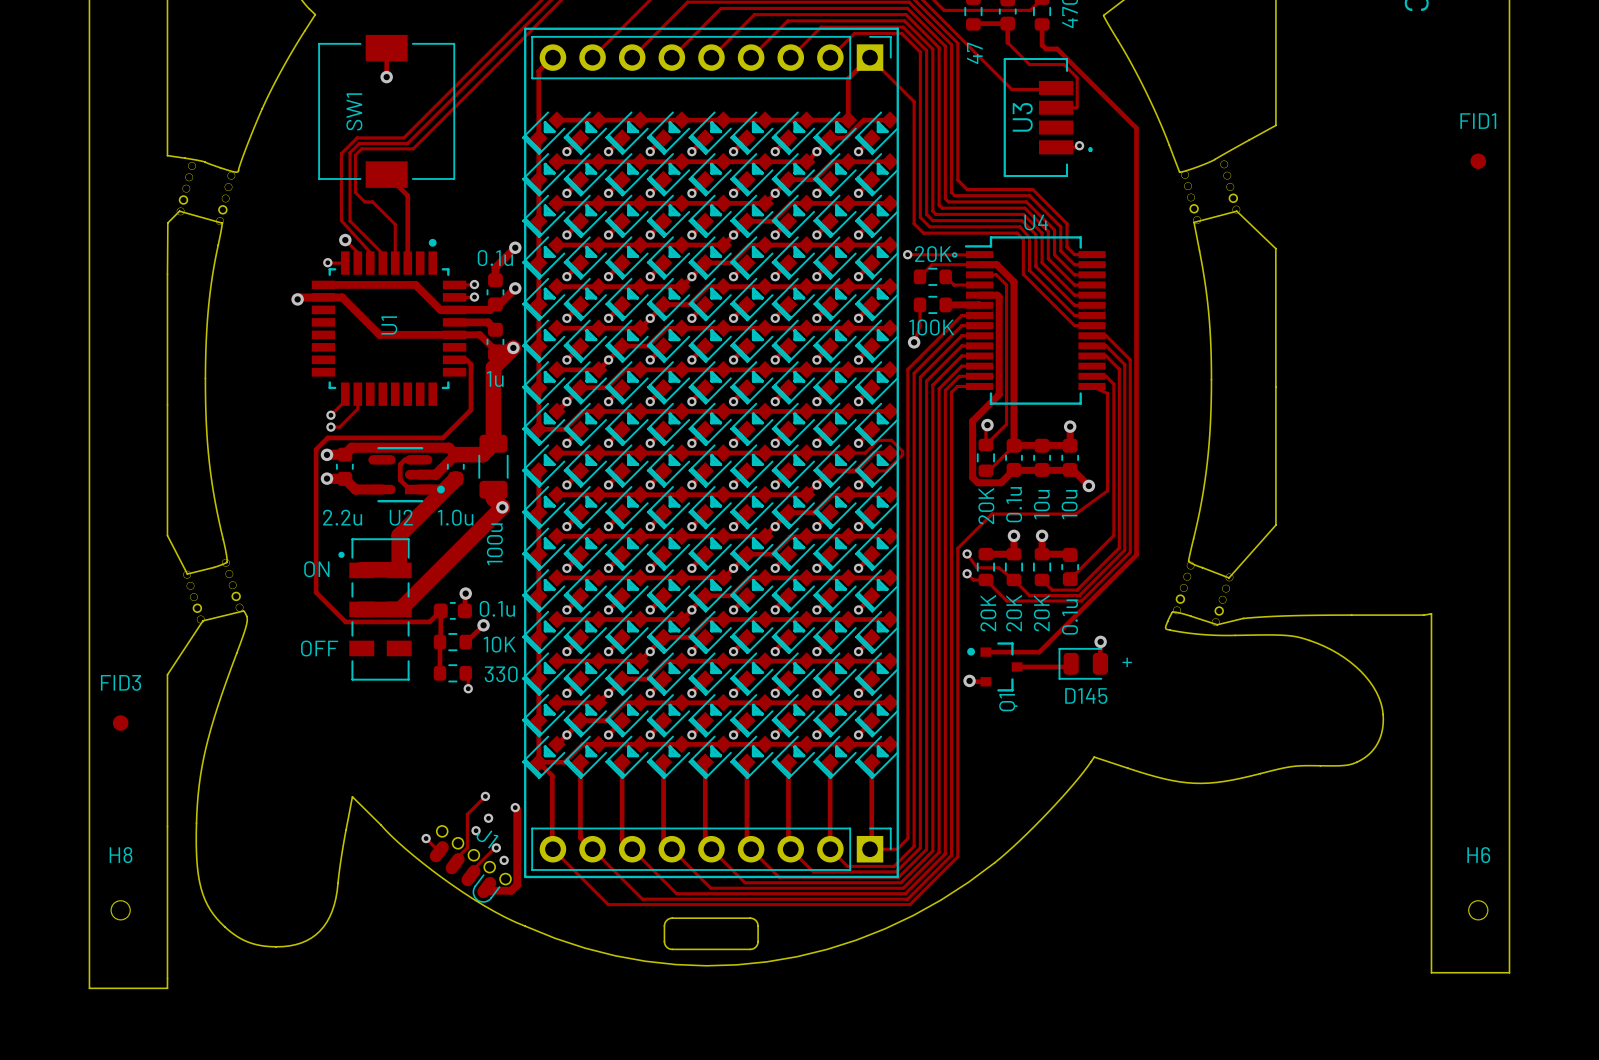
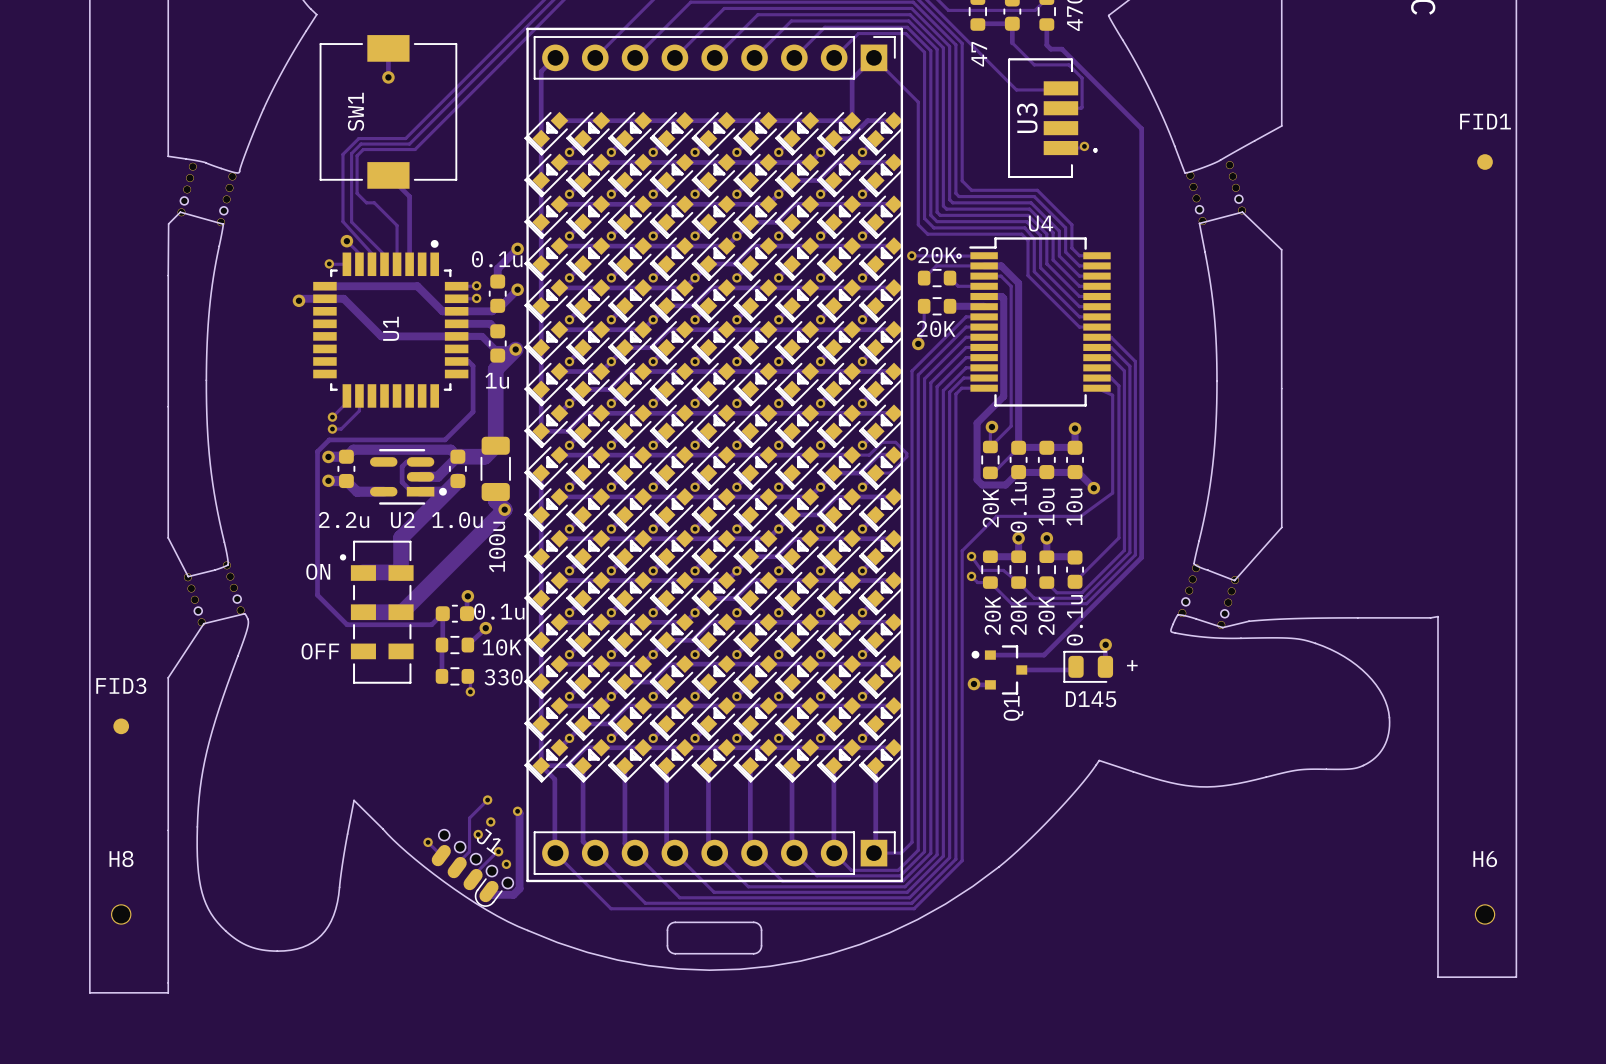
part value: 100K (931, 327) -> 20K (936, 328)

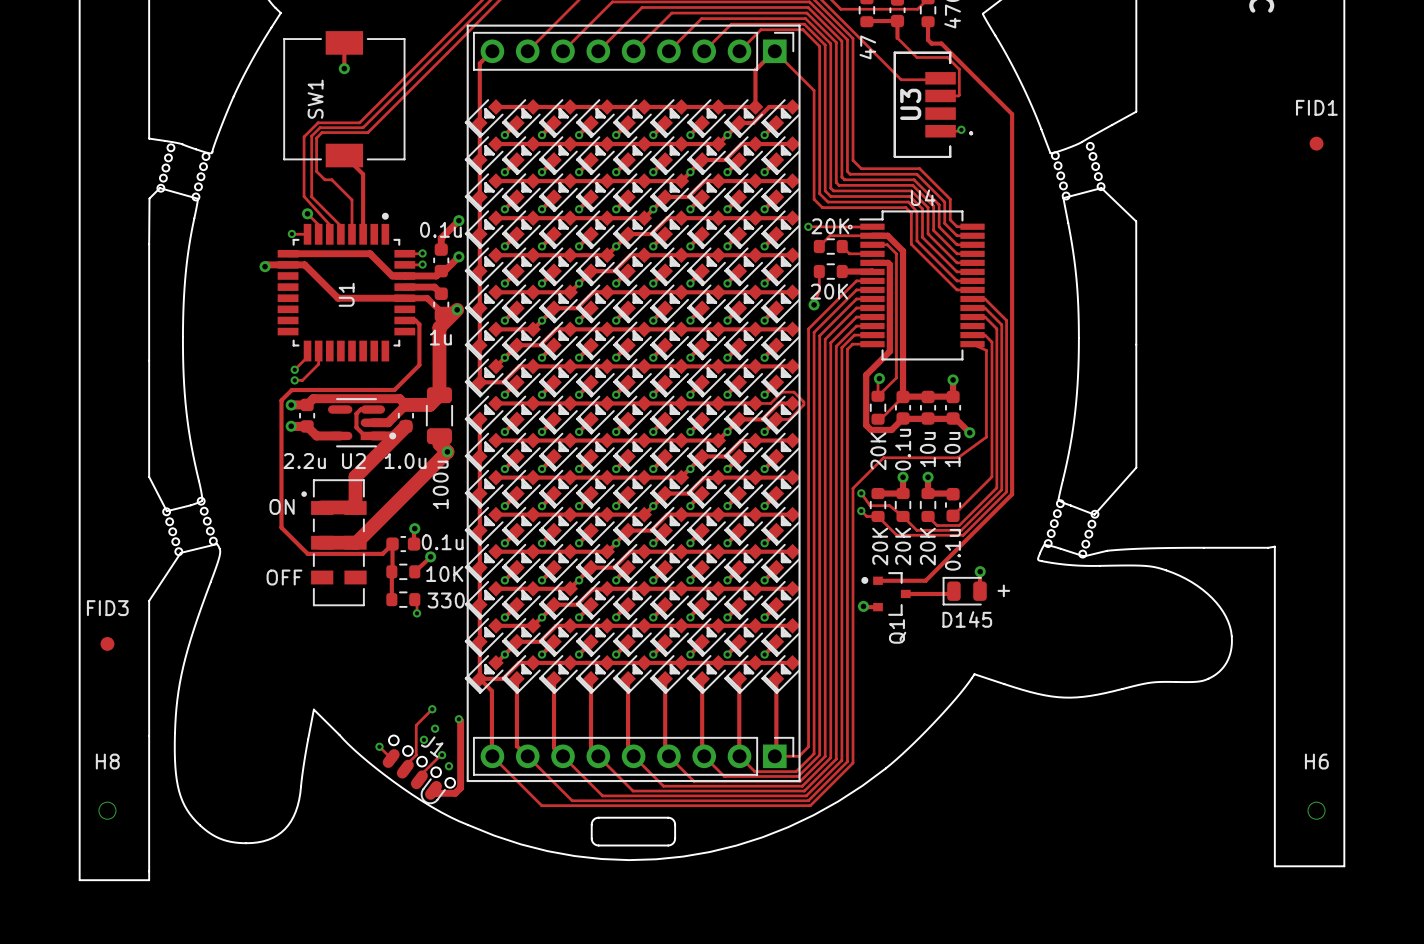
part footprint: [1186, 161, 1246, 225] -> [1051, 142, 1105, 200]
part footprint: [177, 162, 237, 227] -> [157, 144, 210, 201]
part footprint: [184, 561, 245, 627] -> [163, 497, 217, 556]
part footprint: [1178, 564, 1239, 629] -> [1044, 500, 1099, 558]

